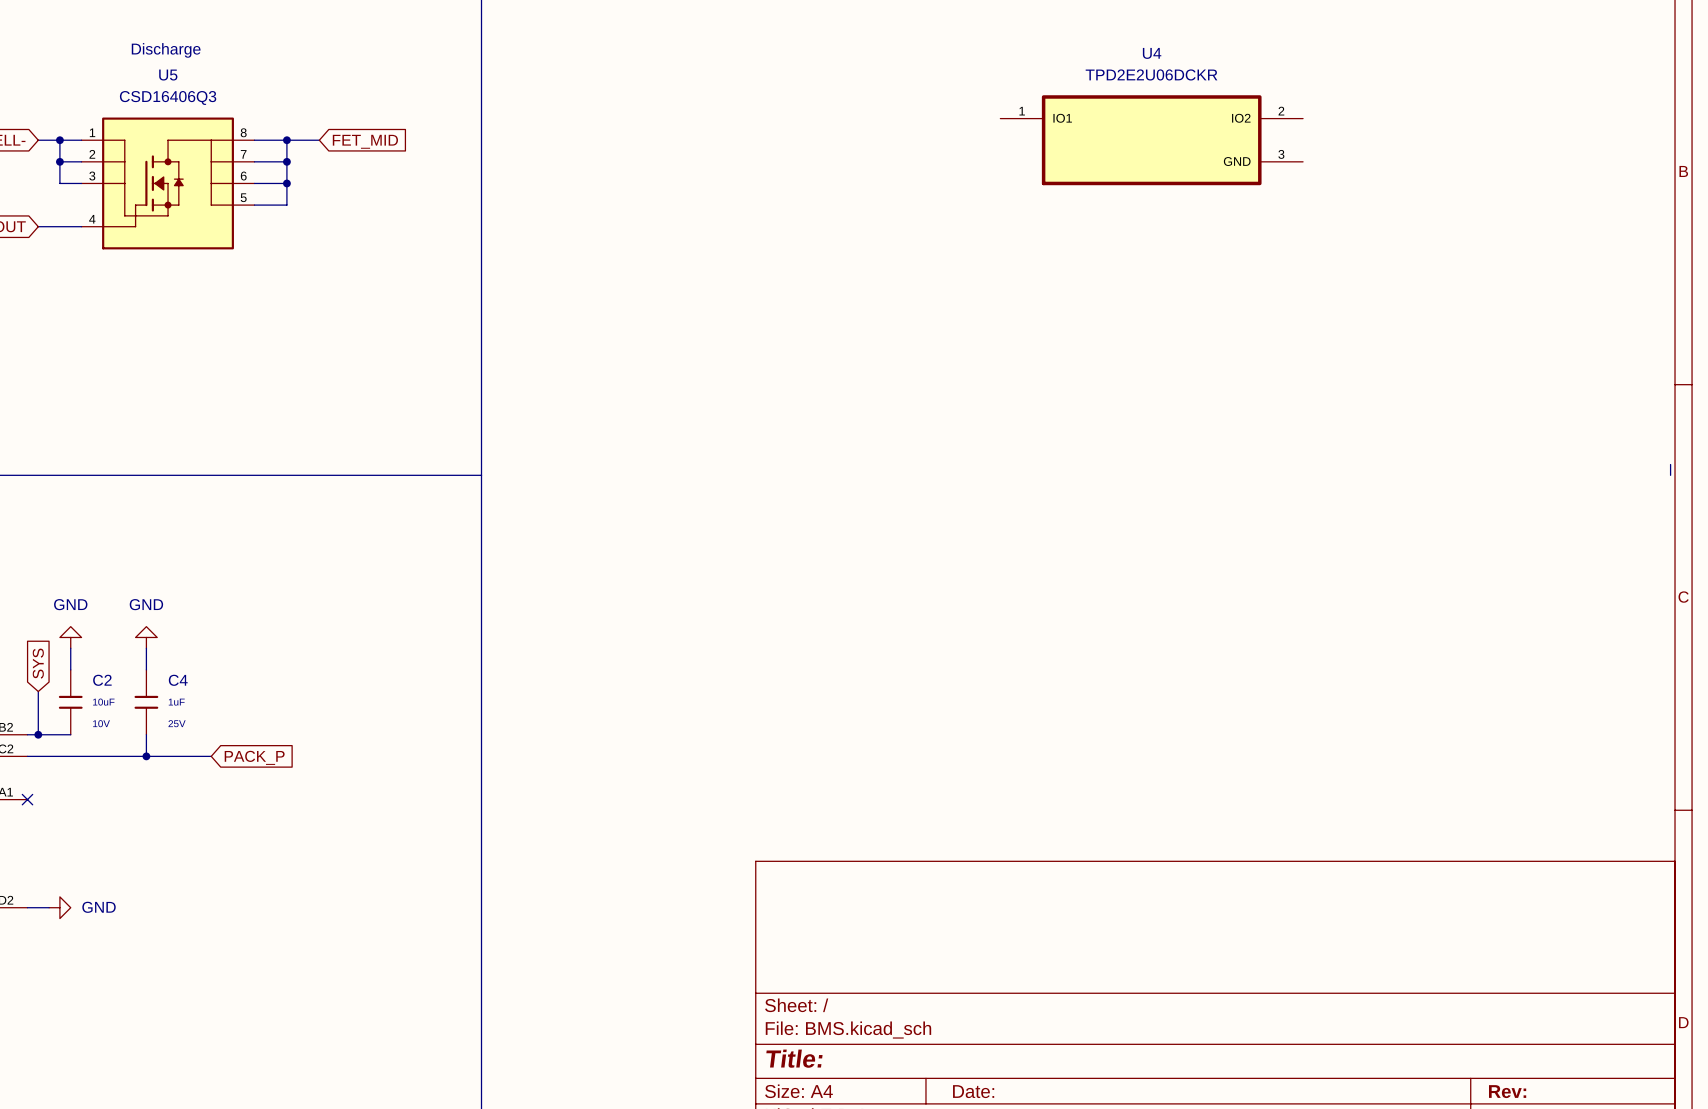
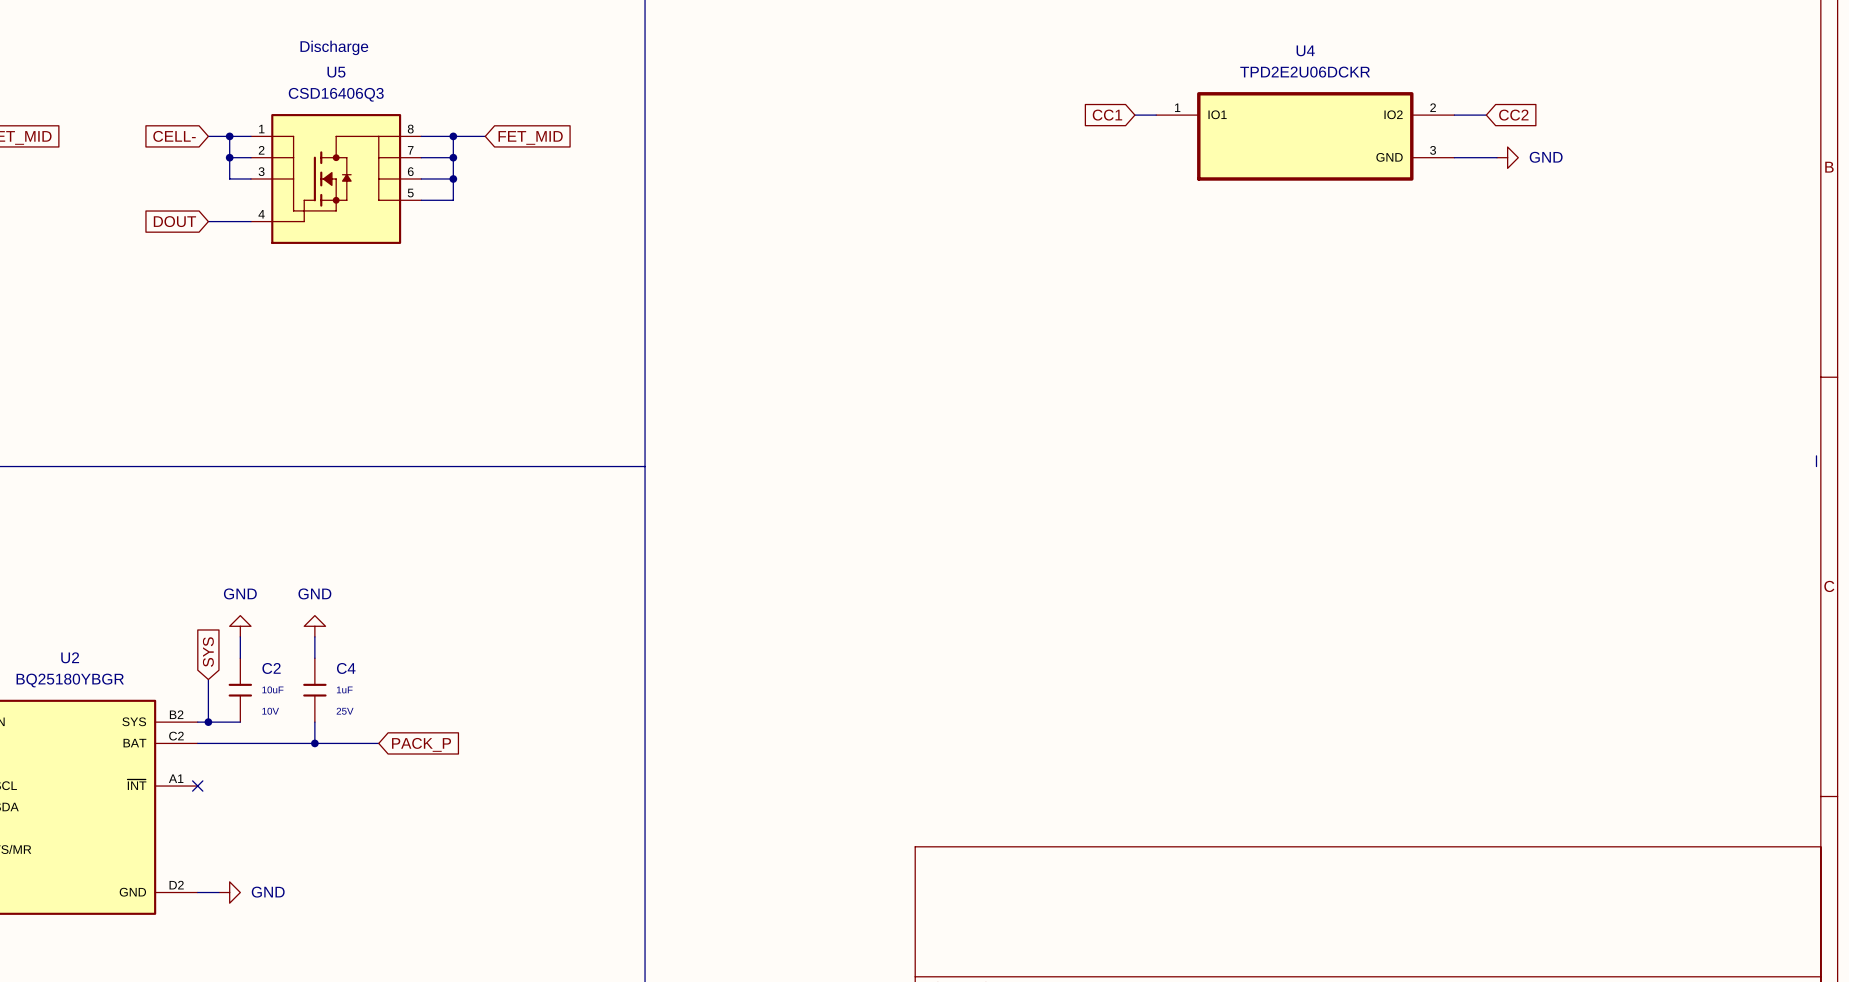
global label: none -> CC1 (1107, 115)
wire: none -> (1134, 115) (1156, 115)
wire: none -> (1454, 115) (1486, 115)
global label: none -> CC2 (1513, 115)
wire: none -> (1454, 157) (1496, 157)
power symbol: none -> GND (1507, 157)

